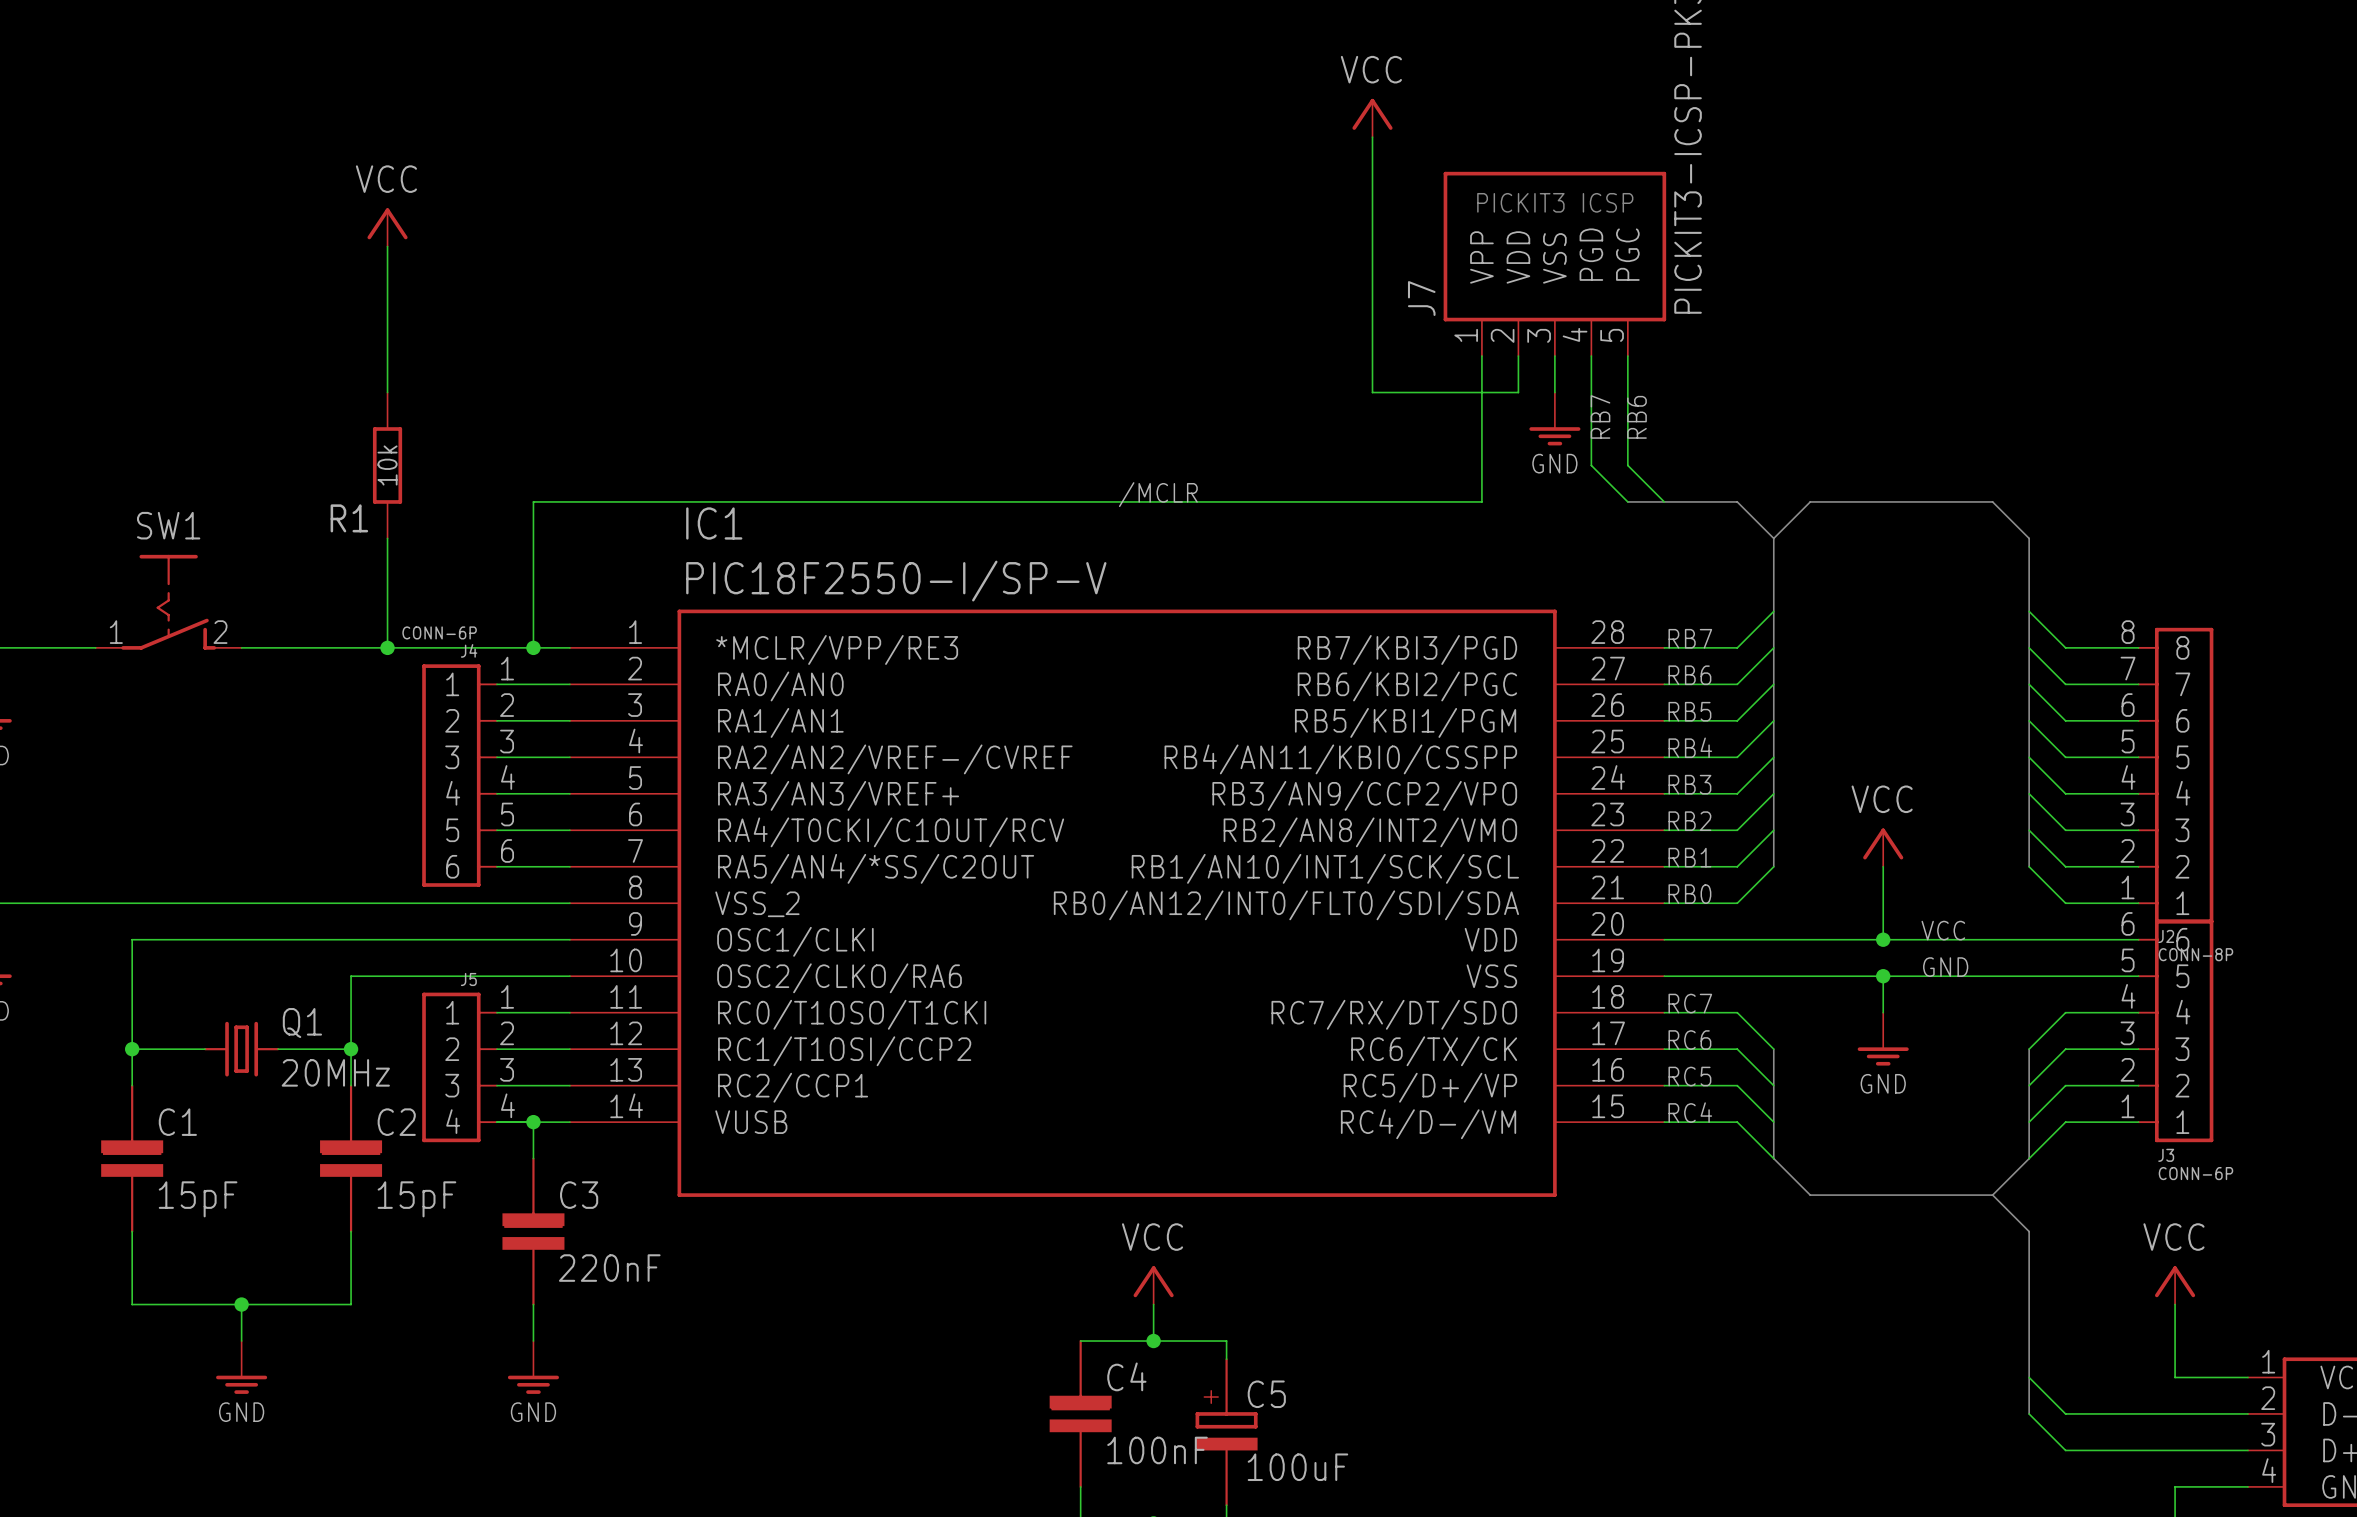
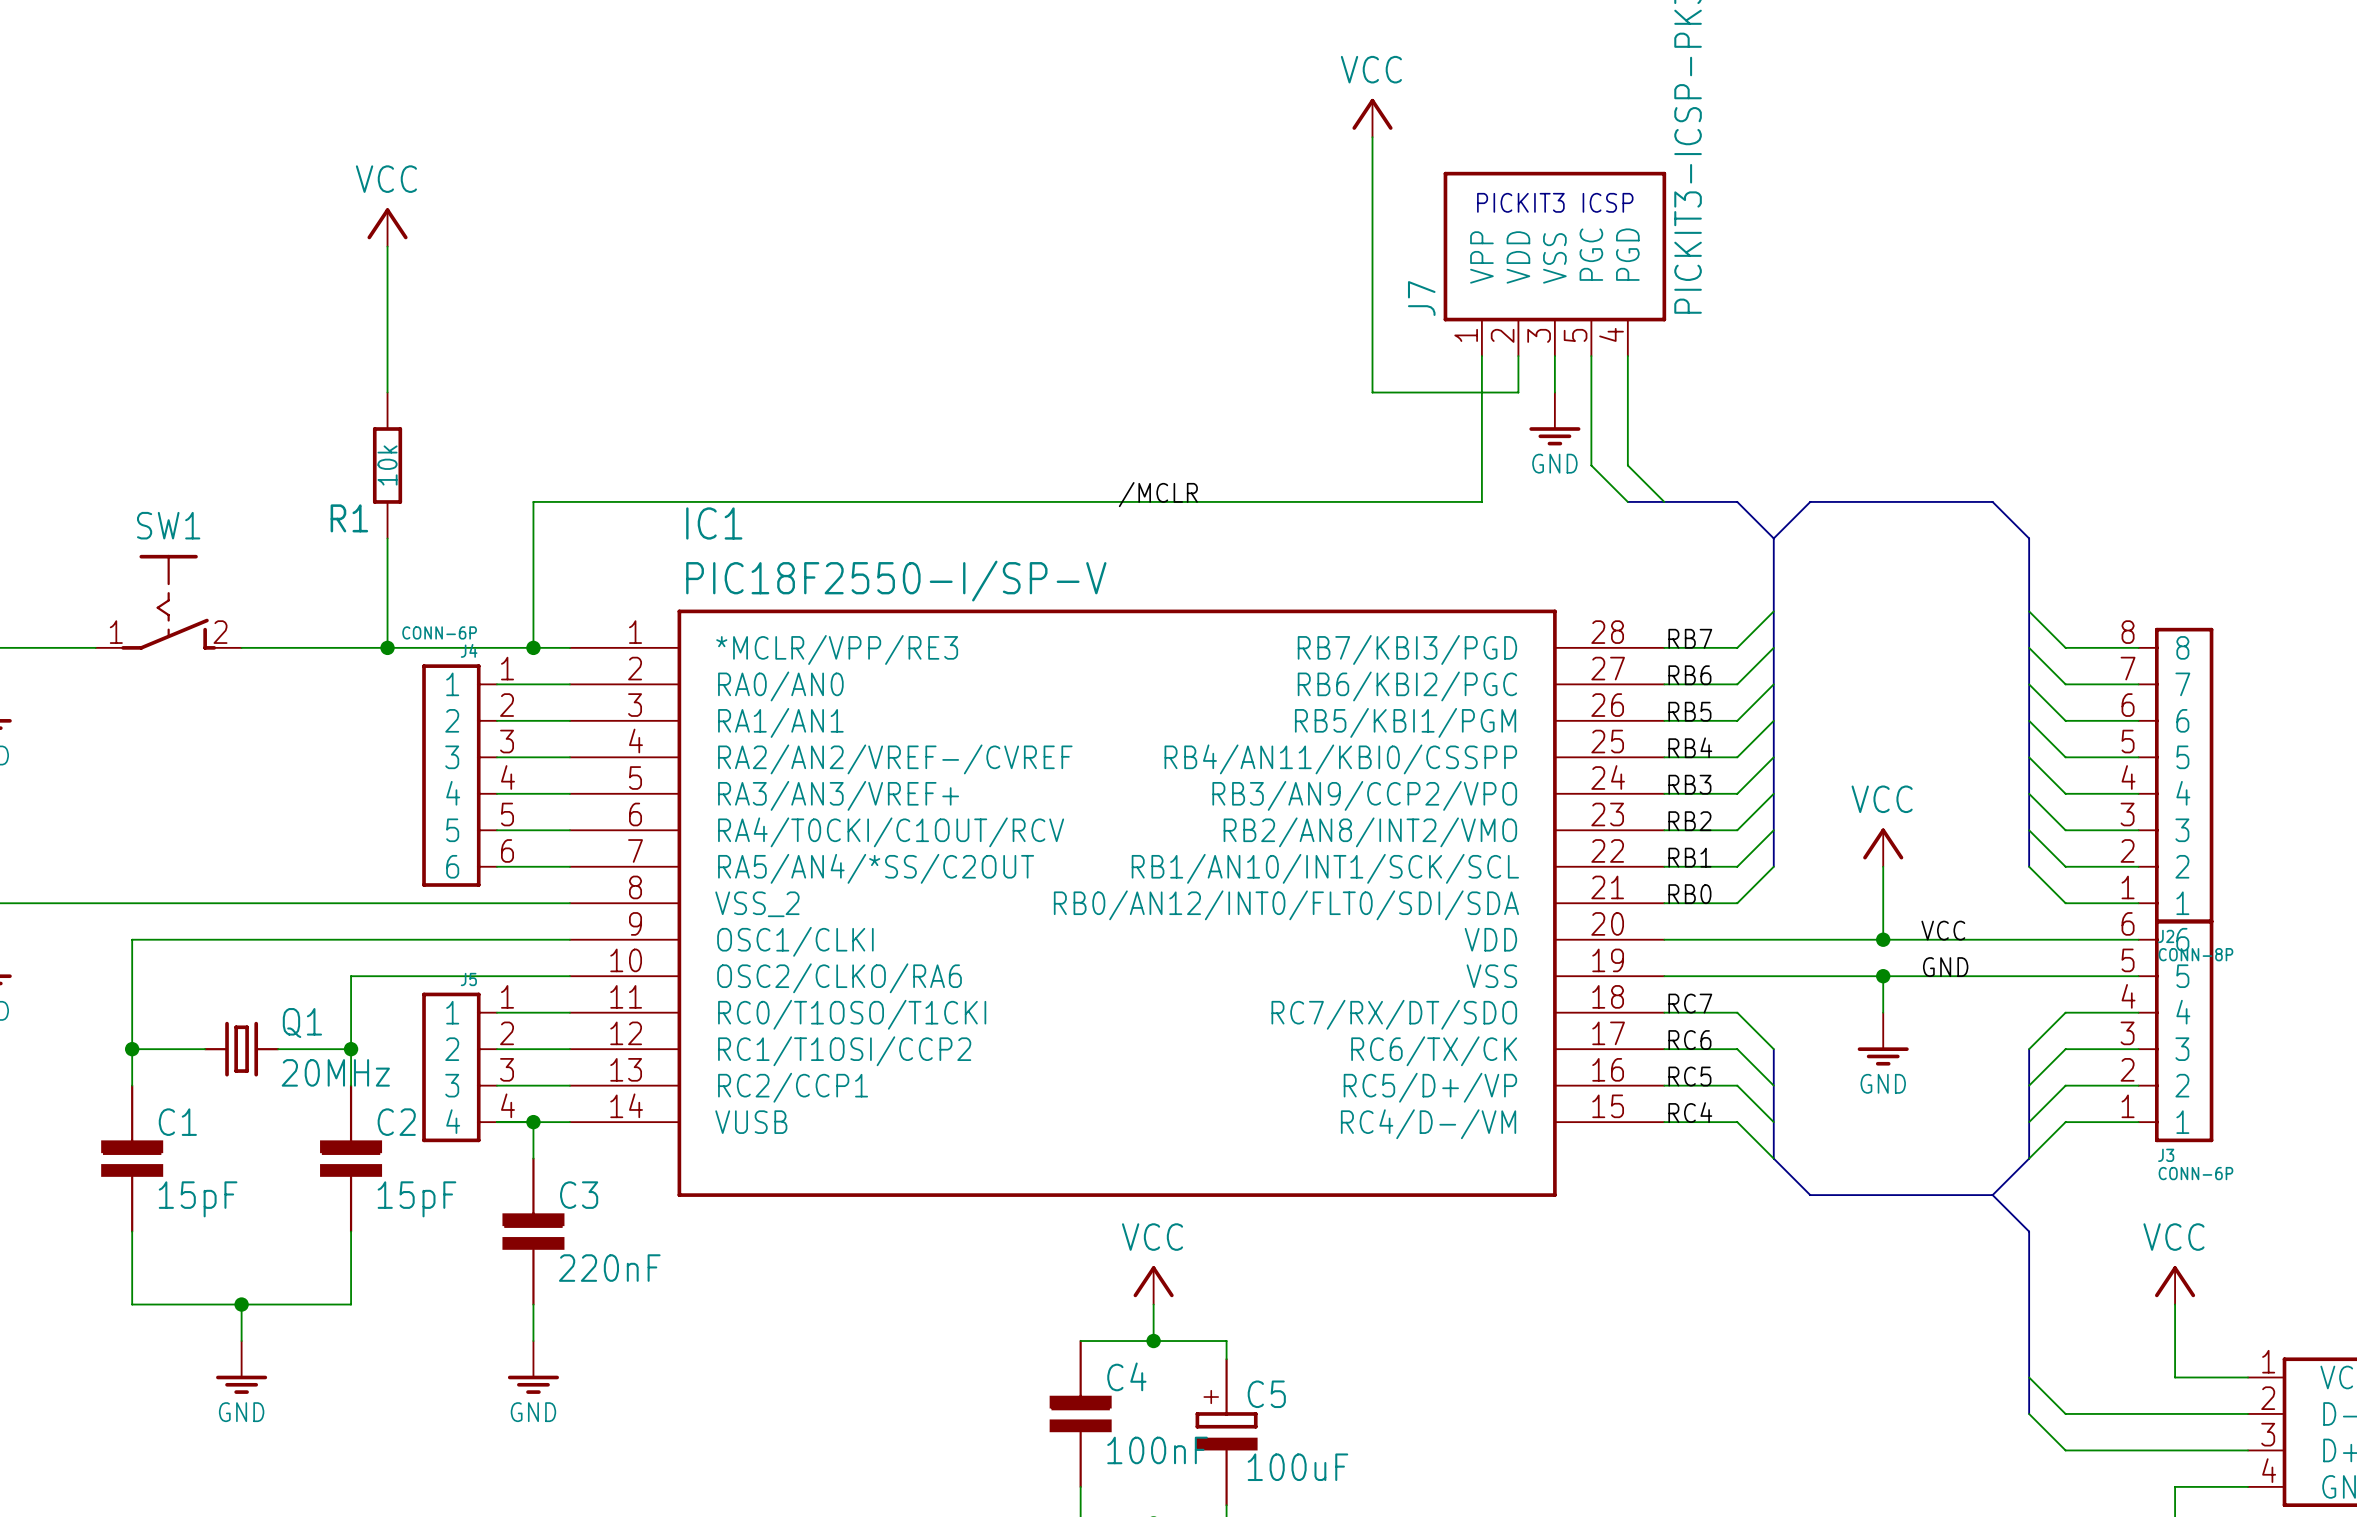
J7 pin name: PGD (1591, 254) -> PGC (1591, 254)
J7 pin name: PGC (1627, 254) -> PGD (1627, 254)
J7 pin number: 4 (1575, 334) -> 5 (1575, 335)
J7 pin number: 5 (1612, 335) -> 4 (1611, 334)
label: RB7 (1600, 416) -> none
label: RB6 (1636, 417) -> none

